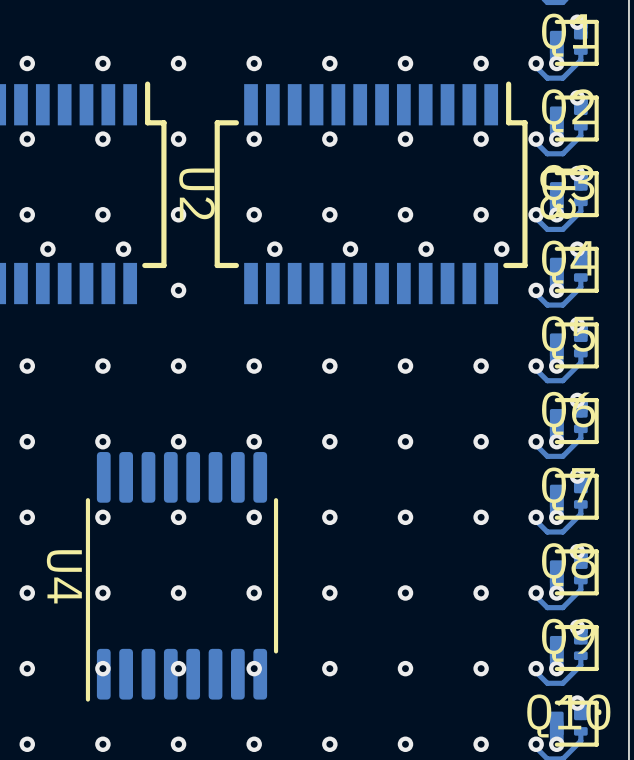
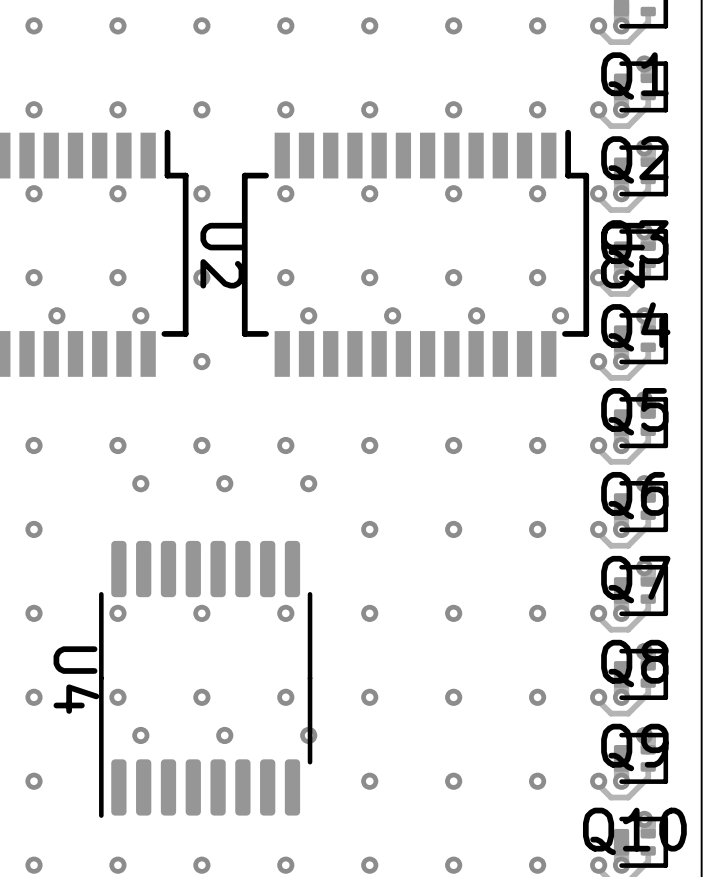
via: none -> (140, 483)
via: none -> (224, 483)
via: none -> (308, 483)
via: (102, 441) -> none
via: (178, 441) -> none
via: (254, 441) -> none
via: none -> (140, 735)
via: none -> (224, 735)
via: none -> (308, 735)
via: (102, 668) -> none
via: (178, 668) -> none
via: (254, 668) -> none

